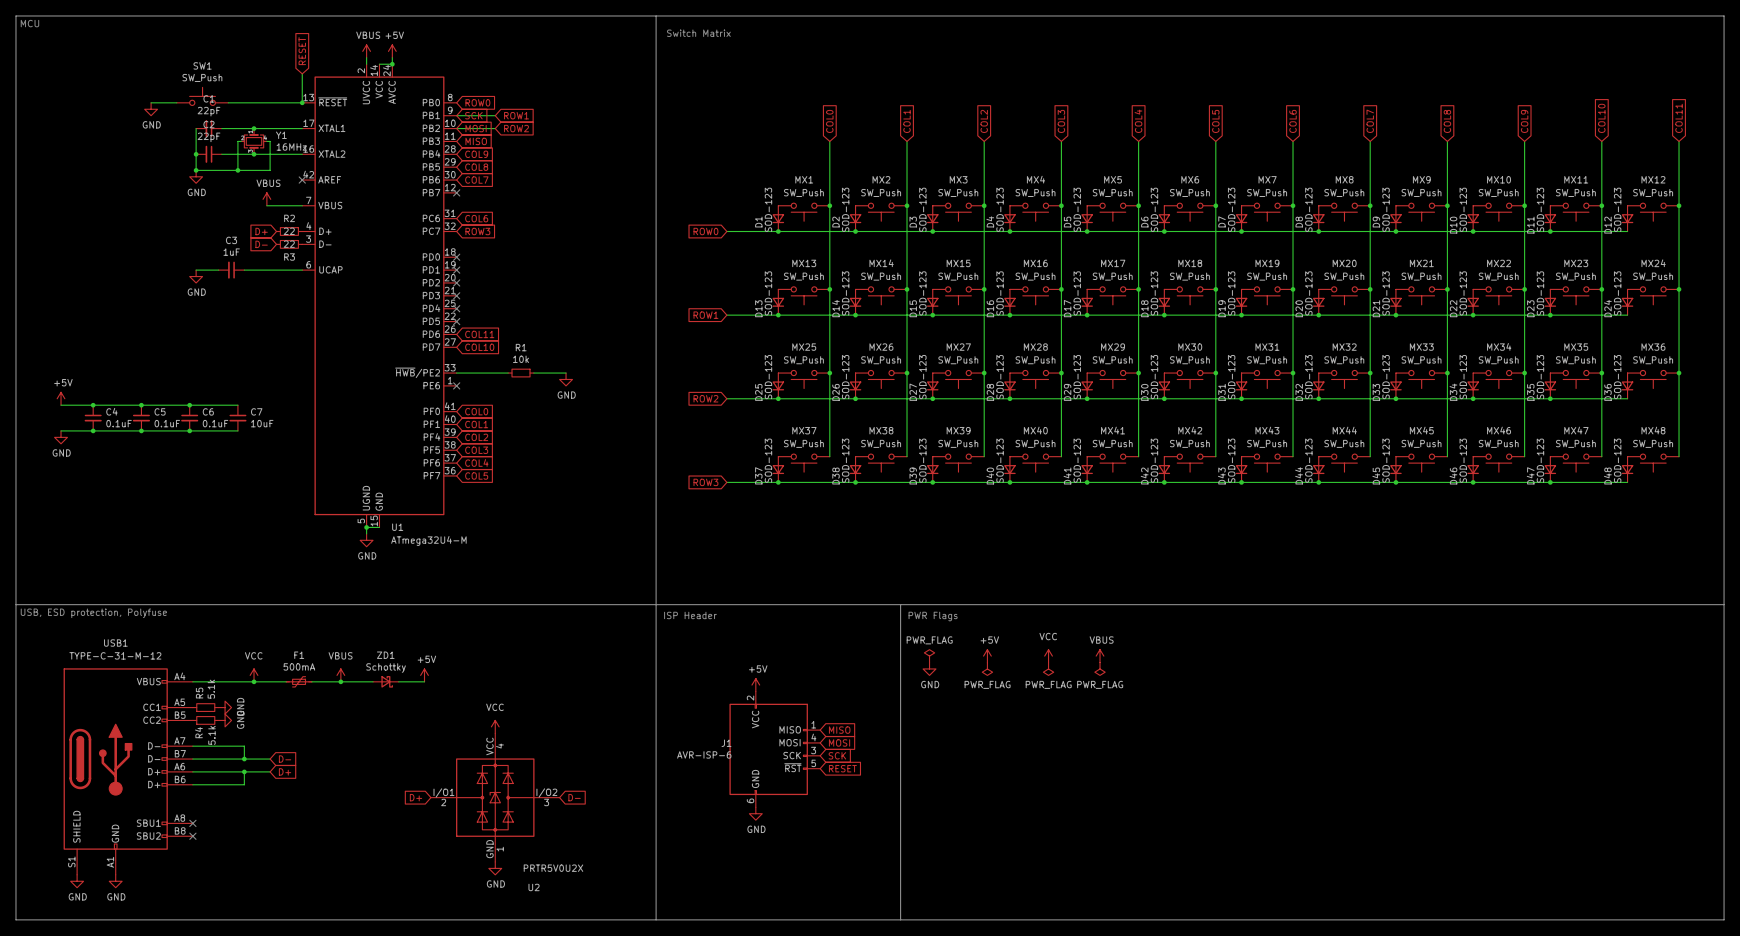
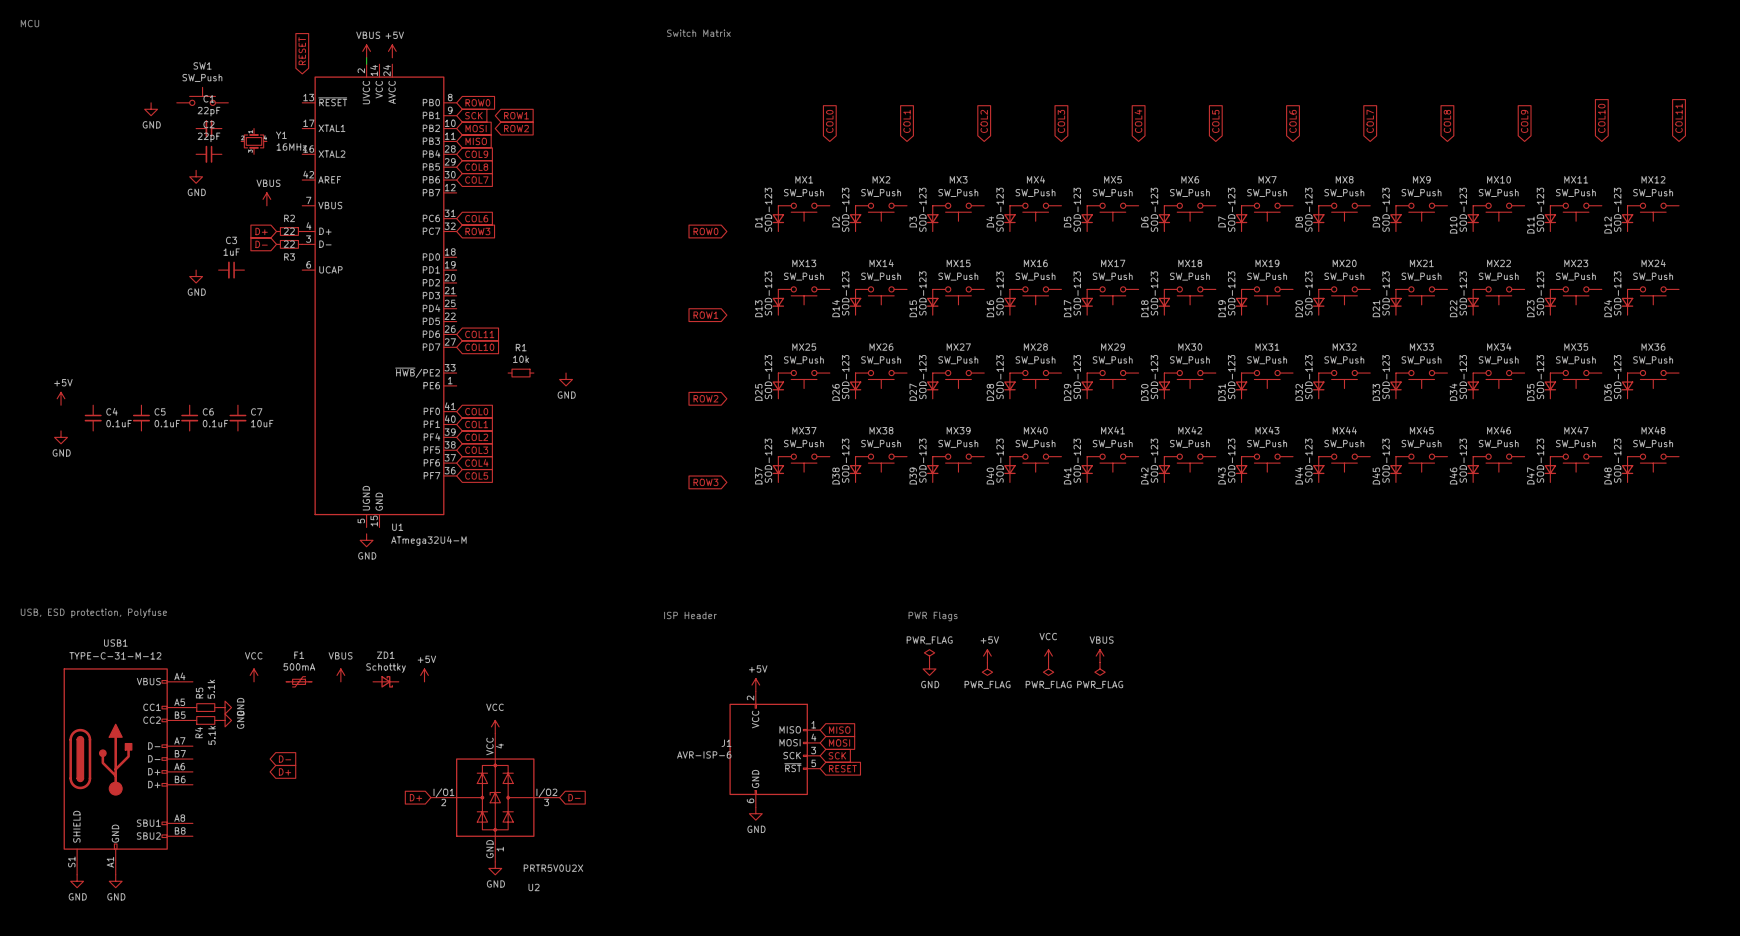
line: (15, 15) (15, 919) (1724, 919) (1724, 15) (15, 15) -> none
line: (656, 15) (656, 919) -> none
wire: (392, 57) (392, 64) (379, 64) -> none
junction: (392, 64) -> none
wire: (302, 73) (302, 102) (228, 102) -> none
wire: (151, 102) (176, 102) -> none
junction: (302, 102) -> none
wire: (456, 115) (495, 115) -> none
wire: (196, 128) (196, 170) (270, 170) (270, 141) (266, 141) -> none
wire: (221, 128) (302, 128) -> none
junction: (254, 128) -> none
wire: (456, 128) (495, 128) -> none
wire: (241, 141) (237, 141) (237, 170) -> none
wire: (829, 141) (829, 456) -> none
wire: (907, 141) (907, 456) -> none
wire: (984, 141) (984, 456) -> none
wire: (1061, 141) (1061, 456) -> none
wire: (1138, 141) (1138, 456) -> none
wire: (1215, 141) (1215, 456) -> none
wire: (1293, 141) (1293, 456) -> none
wire: (1370, 141) (1370, 456) -> none
wire: (1447, 141) (1447, 456) -> none
wire: (1524, 141) (1524, 456) -> none
wire: (1601, 141) (1601, 456) -> none
wire: (1679, 141) (1679, 456) -> none
junction: (196, 154) -> none
wire: (221, 154) (302, 154) -> none
junction: (254, 154) -> none
junction: (196, 170) -> none
junction: (237, 170) -> none
no-connect mark: (302, 180) -> none
no-connect mark: (456, 192) -> none
wire: (266, 205) (302, 205) -> none
junction: (829, 205) -> none
junction: (907, 205) -> none
junction: (984, 205) -> none
junction: (1061, 205) -> none
junction: (1138, 205) -> none
junction: (1215, 205) -> none
junction: (1293, 205) -> none
junction: (1370, 205) -> none
junction: (1447, 205) -> none
junction: (1524, 205) -> none
junction: (1601, 205) -> none
junction: (1679, 205) -> none
wire: (726, 231) (1627, 231) -> none
junction: (778, 231) -> none
junction: (855, 231) -> none
junction: (932, 231) -> none
junction: (1009, 231) -> none
junction: (1087, 231) -> none
junction: (1164, 231) -> none
junction: (1241, 231) -> none
junction: (1318, 231) -> none
junction: (1395, 231) -> none
junction: (1473, 231) -> none
junction: (1550, 231) -> none
no-connect mark: (456, 257) -> none
wire: (196, 270) (218, 270) -> none
wire: (244, 270) (302, 270) -> none
no-connect mark: (456, 270) -> none
no-connect mark: (456, 282) -> none
junction: (829, 289) -> none
junction: (907, 289) -> none
junction: (984, 289) -> none
junction: (1061, 289) -> none
junction: (1138, 289) -> none
junction: (1215, 289) -> none
junction: (1293, 289) -> none
junction: (1370, 289) -> none
junction: (1447, 289) -> none
junction: (1524, 289) -> none
junction: (1601, 289) -> none
junction: (1679, 289) -> none
no-connect mark: (456, 295) -> none
no-connect mark: (456, 308) -> none
wire: (726, 315) (1627, 315) -> none
junction: (778, 315) -> none
junction: (855, 315) -> none
junction: (932, 315) -> none
junction: (1009, 315) -> none
junction: (1087, 315) -> none
junction: (1164, 315) -> none
junction: (1241, 315) -> none
junction: (1318, 315) -> none
junction: (1395, 315) -> none
junction: (1473, 315) -> none
junction: (1550, 315) -> none
no-connect mark: (456, 321) -> none
wire: (456, 373) (508, 373) -> none
wire: (533, 373) (566, 373) -> none
junction: (829, 373) -> none
junction: (907, 373) -> none
junction: (984, 373) -> none
junction: (1061, 373) -> none
junction: (1138, 373) -> none
junction: (1215, 373) -> none
junction: (1293, 373) -> none
junction: (1370, 373) -> none
junction: (1447, 373) -> none
junction: (1524, 373) -> none
junction: (1601, 373) -> none
junction: (1679, 373) -> none
no-connect mark: (456, 385) -> none
wire: (726, 398) (1627, 398) -> none
junction: (778, 398) -> none
junction: (855, 398) -> none
junction: (932, 398) -> none
junction: (1009, 398) -> none
junction: (1087, 398) -> none
junction: (1164, 398) -> none
junction: (1241, 398) -> none
junction: (1318, 398) -> none
junction: (1395, 398) -> none
junction: (1473, 398) -> none
junction: (1550, 398) -> none
wire: (61, 405) (237, 405) -> none
junction: (93, 405) -> none
junction: (141, 405) -> none
junction: (189, 405) -> none
wire: (61, 430) (237, 430) -> none
junction: (93, 430) -> none
junction: (141, 430) -> none
junction: (189, 430) -> none
wire: (726, 482) (1627, 482) -> none
junction: (778, 482) -> none
junction: (855, 482) -> none
junction: (932, 482) -> none
junction: (1009, 482) -> none
junction: (1087, 482) -> none
junction: (1164, 482) -> none
junction: (1241, 482) -> none
junction: (1318, 482) -> none
junction: (1395, 482) -> none
junction: (1473, 482) -> none
junction: (1550, 482) -> none
junction: (366, 527) -> none
wire: (379, 527) (366, 527) (366, 533) -> none
line: (15, 604) (1724, 604) -> none
line: (900, 604) (900, 919) -> none
wire: (192, 681) (286, 681) -> none
junction: (254, 681) -> none
wire: (311, 681) (373, 681) -> none
junction: (340, 681) -> none
wire: (398, 681) (424, 681) -> none
wire: (192, 746) (244, 746) (244, 759) -> none
wire: (192, 759) (270, 759) -> none
junction: (244, 759) -> none
wire: (192, 771) (270, 771) -> none
wire: (244, 771) (244, 784) (192, 784) -> none
junction: (244, 771) -> none
no-connect mark: (192, 823) -> none
no-connect mark: (192, 836) -> none

